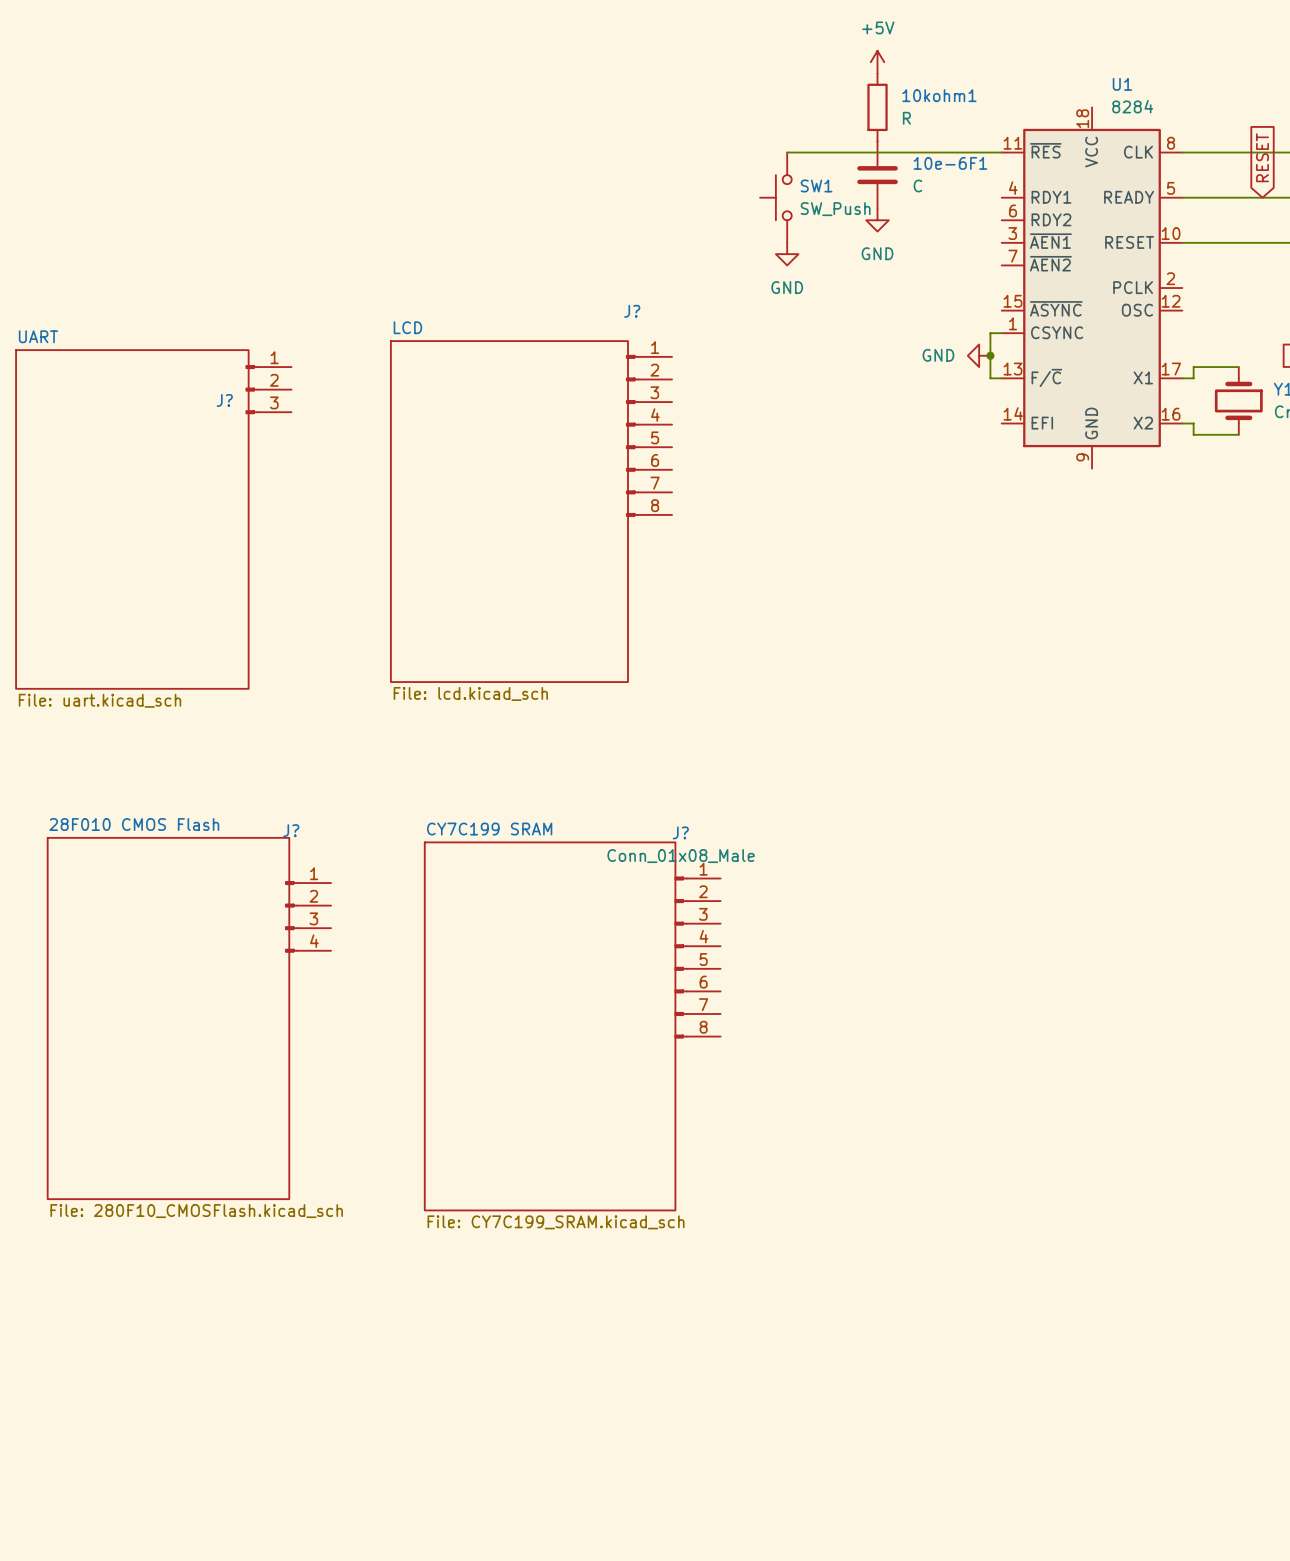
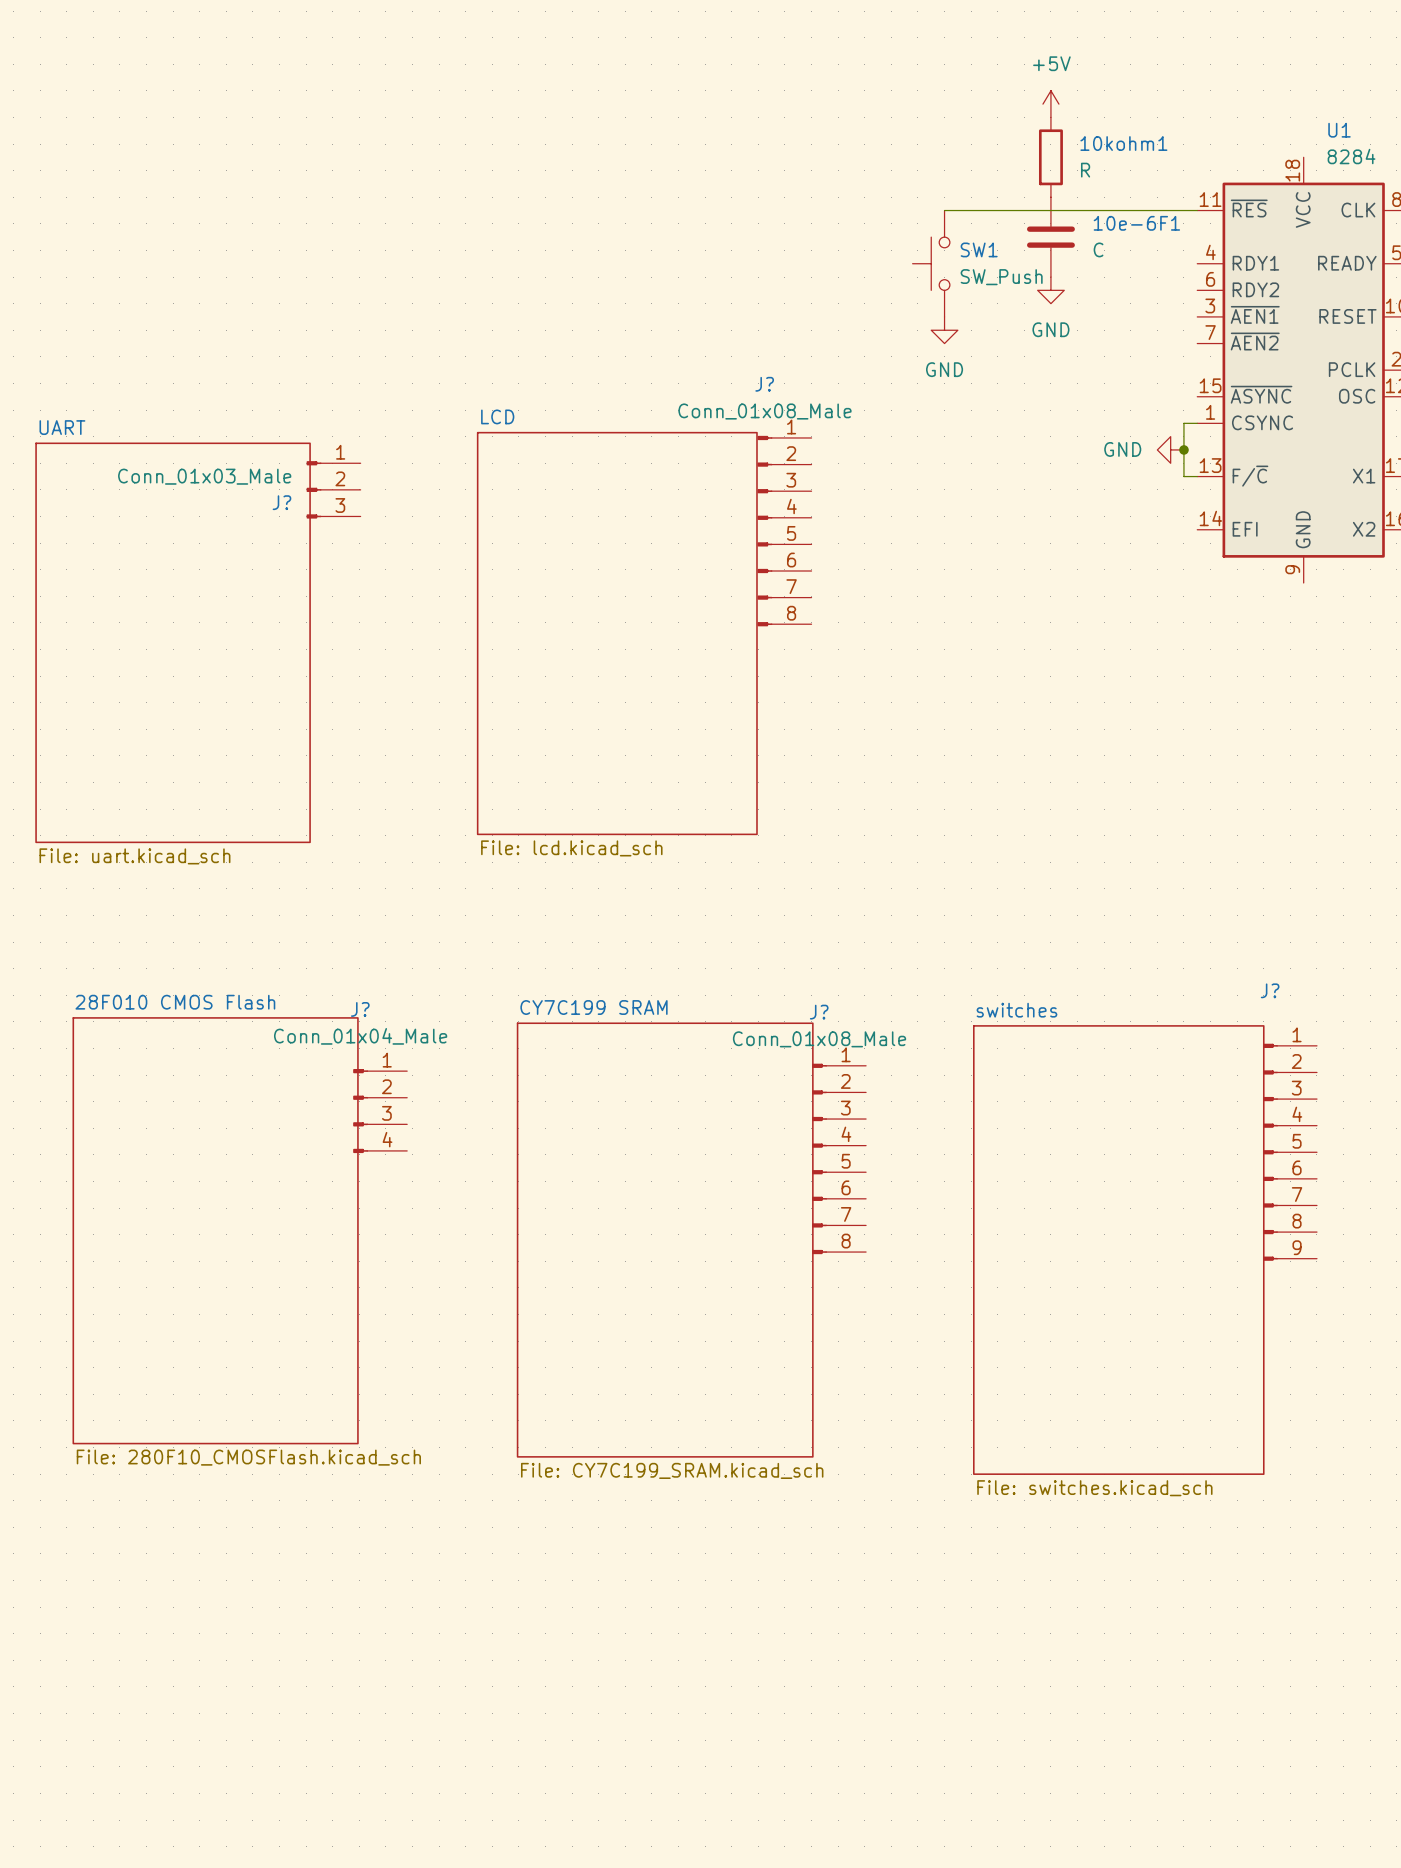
J? value: none -> Conn_01x03_Male (204, 476)
J?: none -> Conn_01x08_Male (784, 531)
J?: (649, 435) -> none
J? value: none -> Conn_01x04_Male (360, 1036)
J?: none -> (1289, 1152)
sheet switches: none -> File: switches.kicad_sch (1118, 1250)

